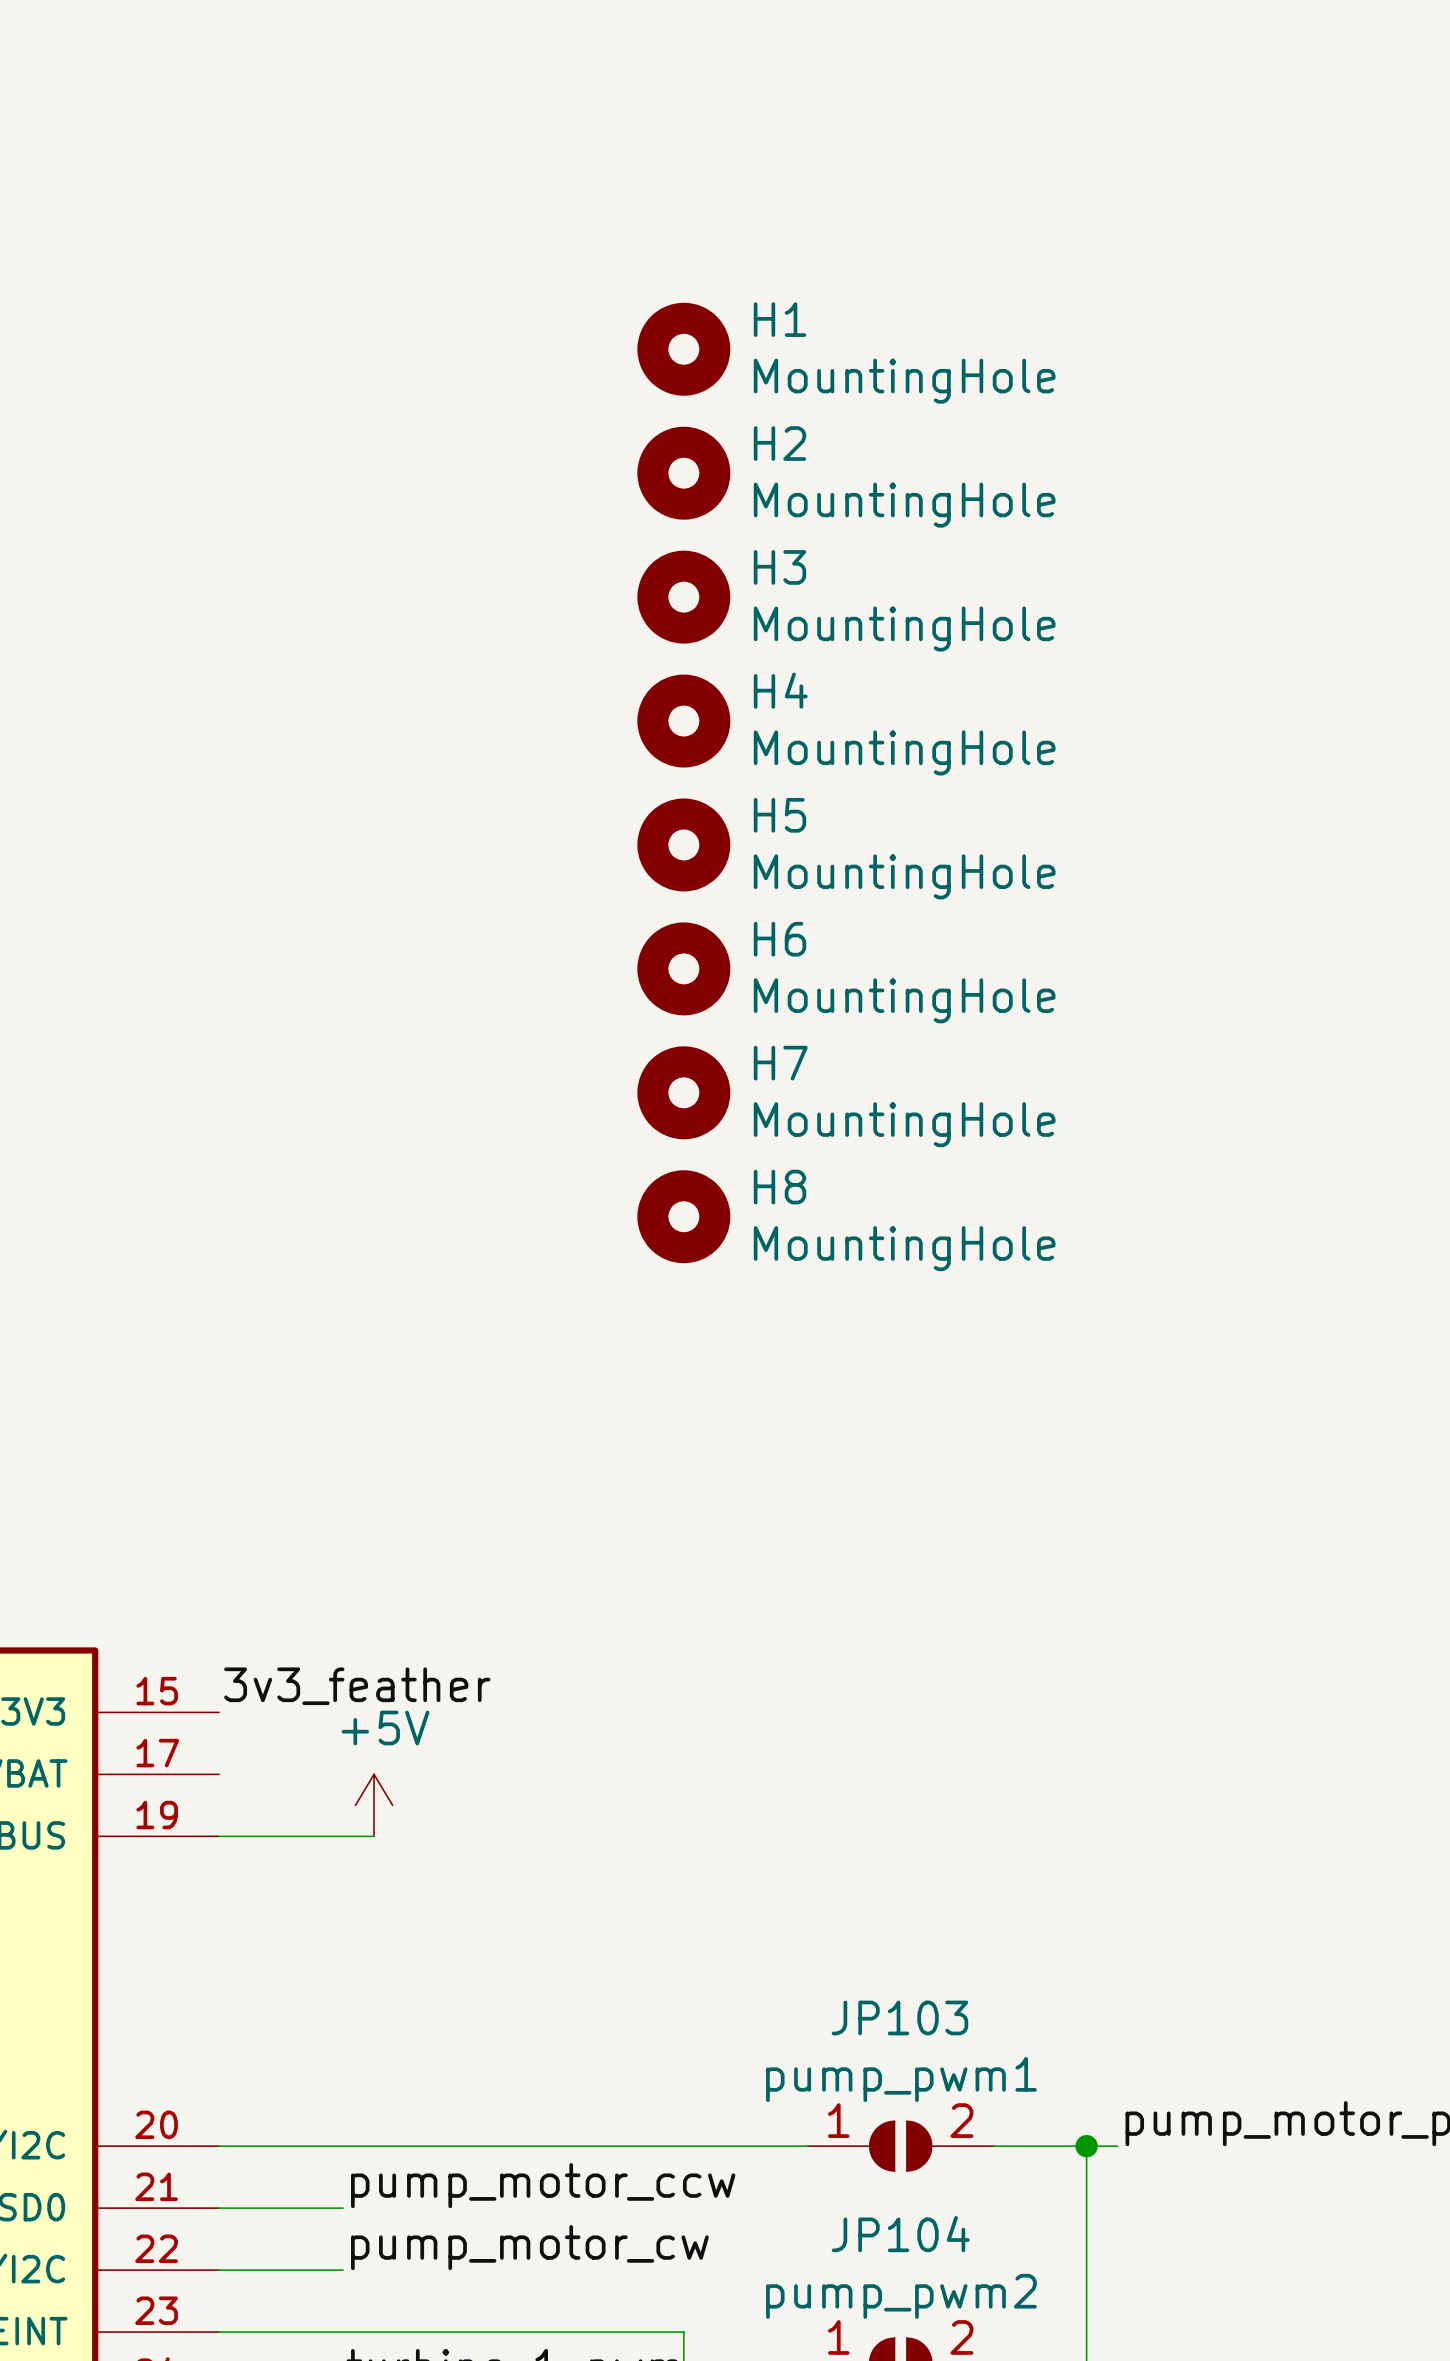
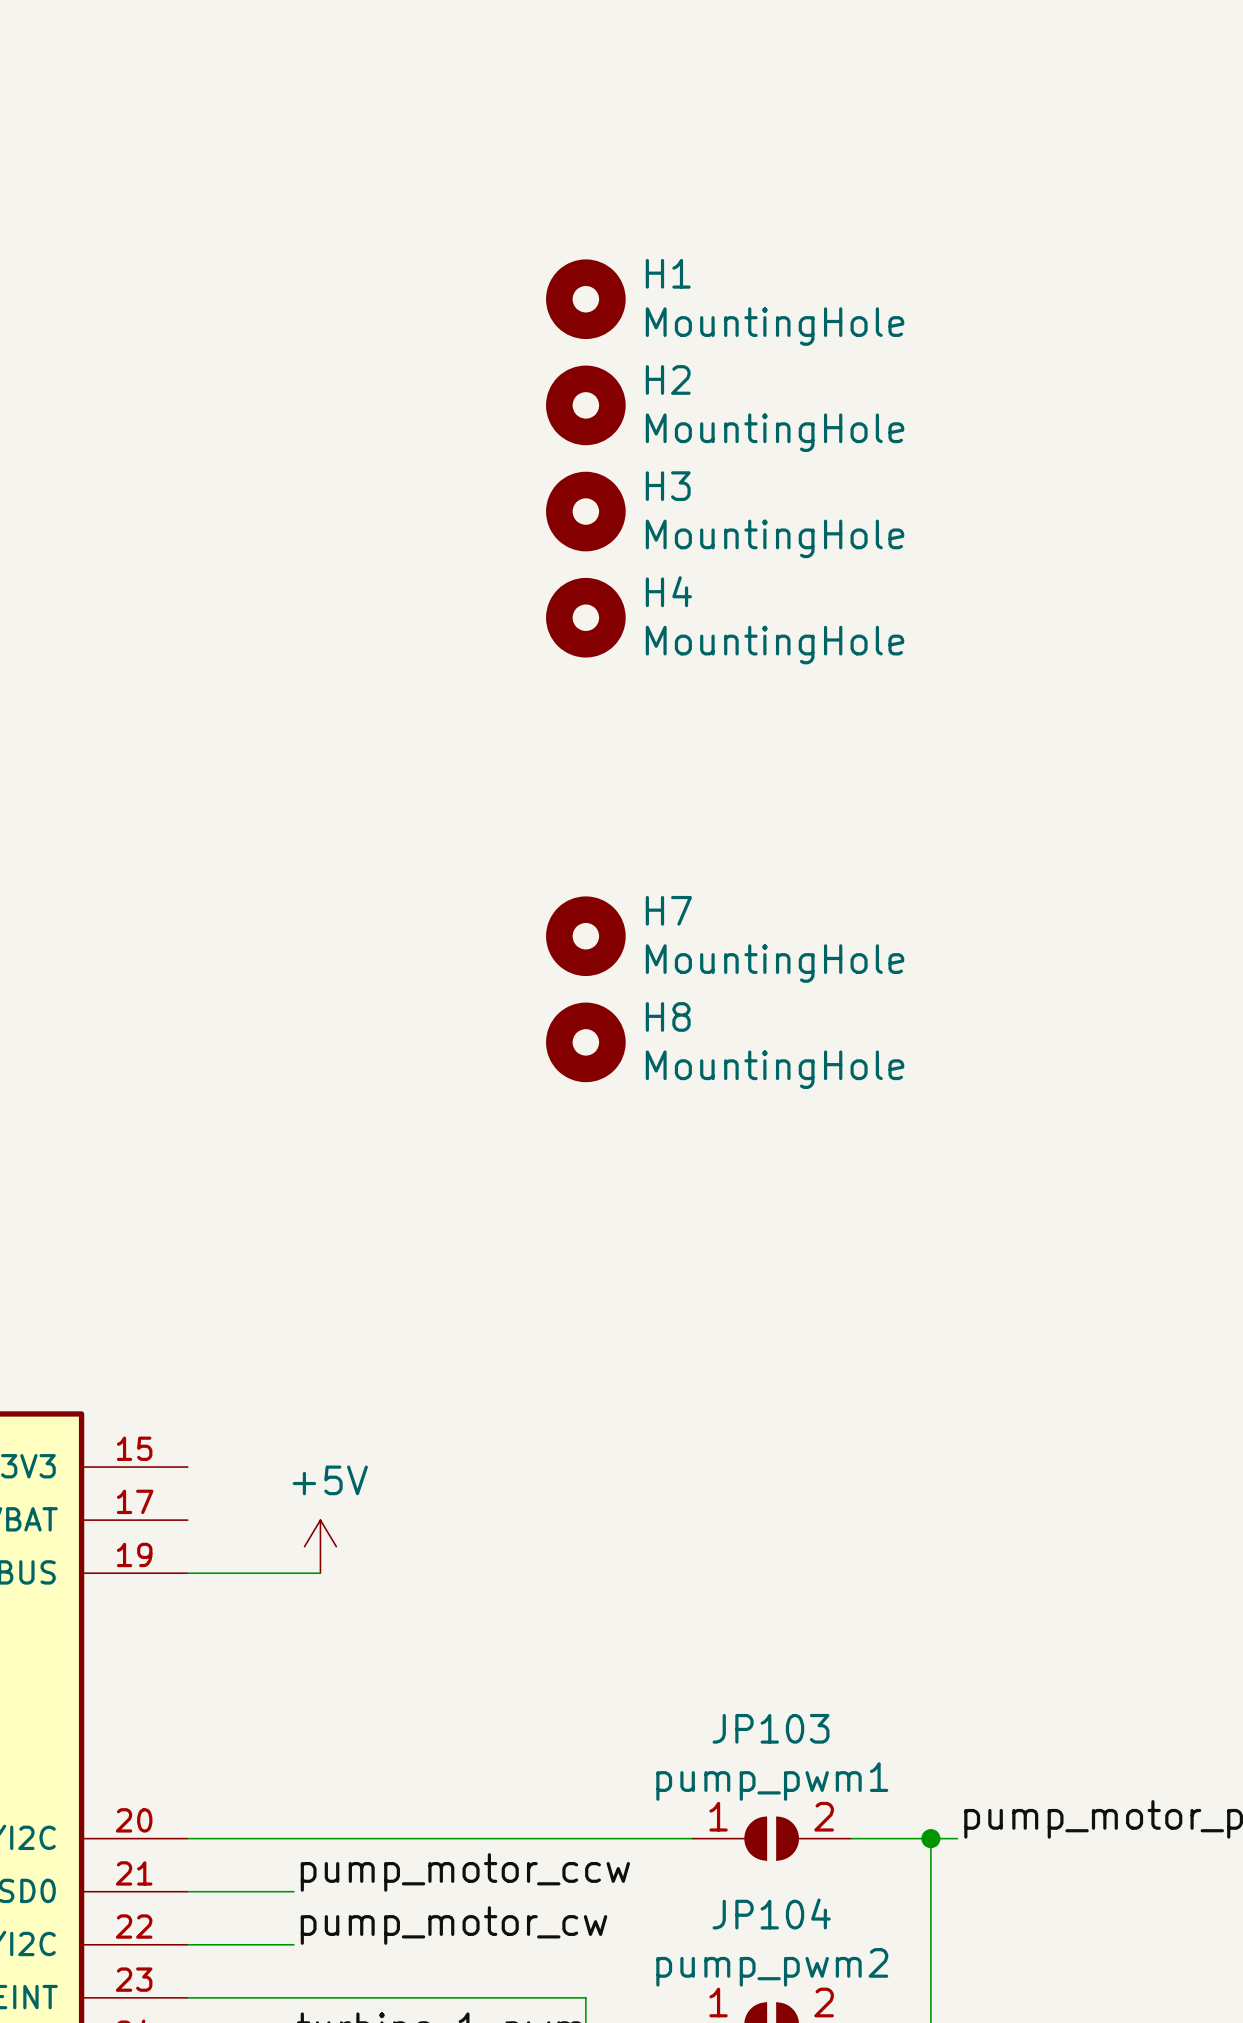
H5: MountingHole (683, 844) -> none
H6: MountingHole (683, 968) -> none
label: 3v3_feather (357, 1686) -> none

